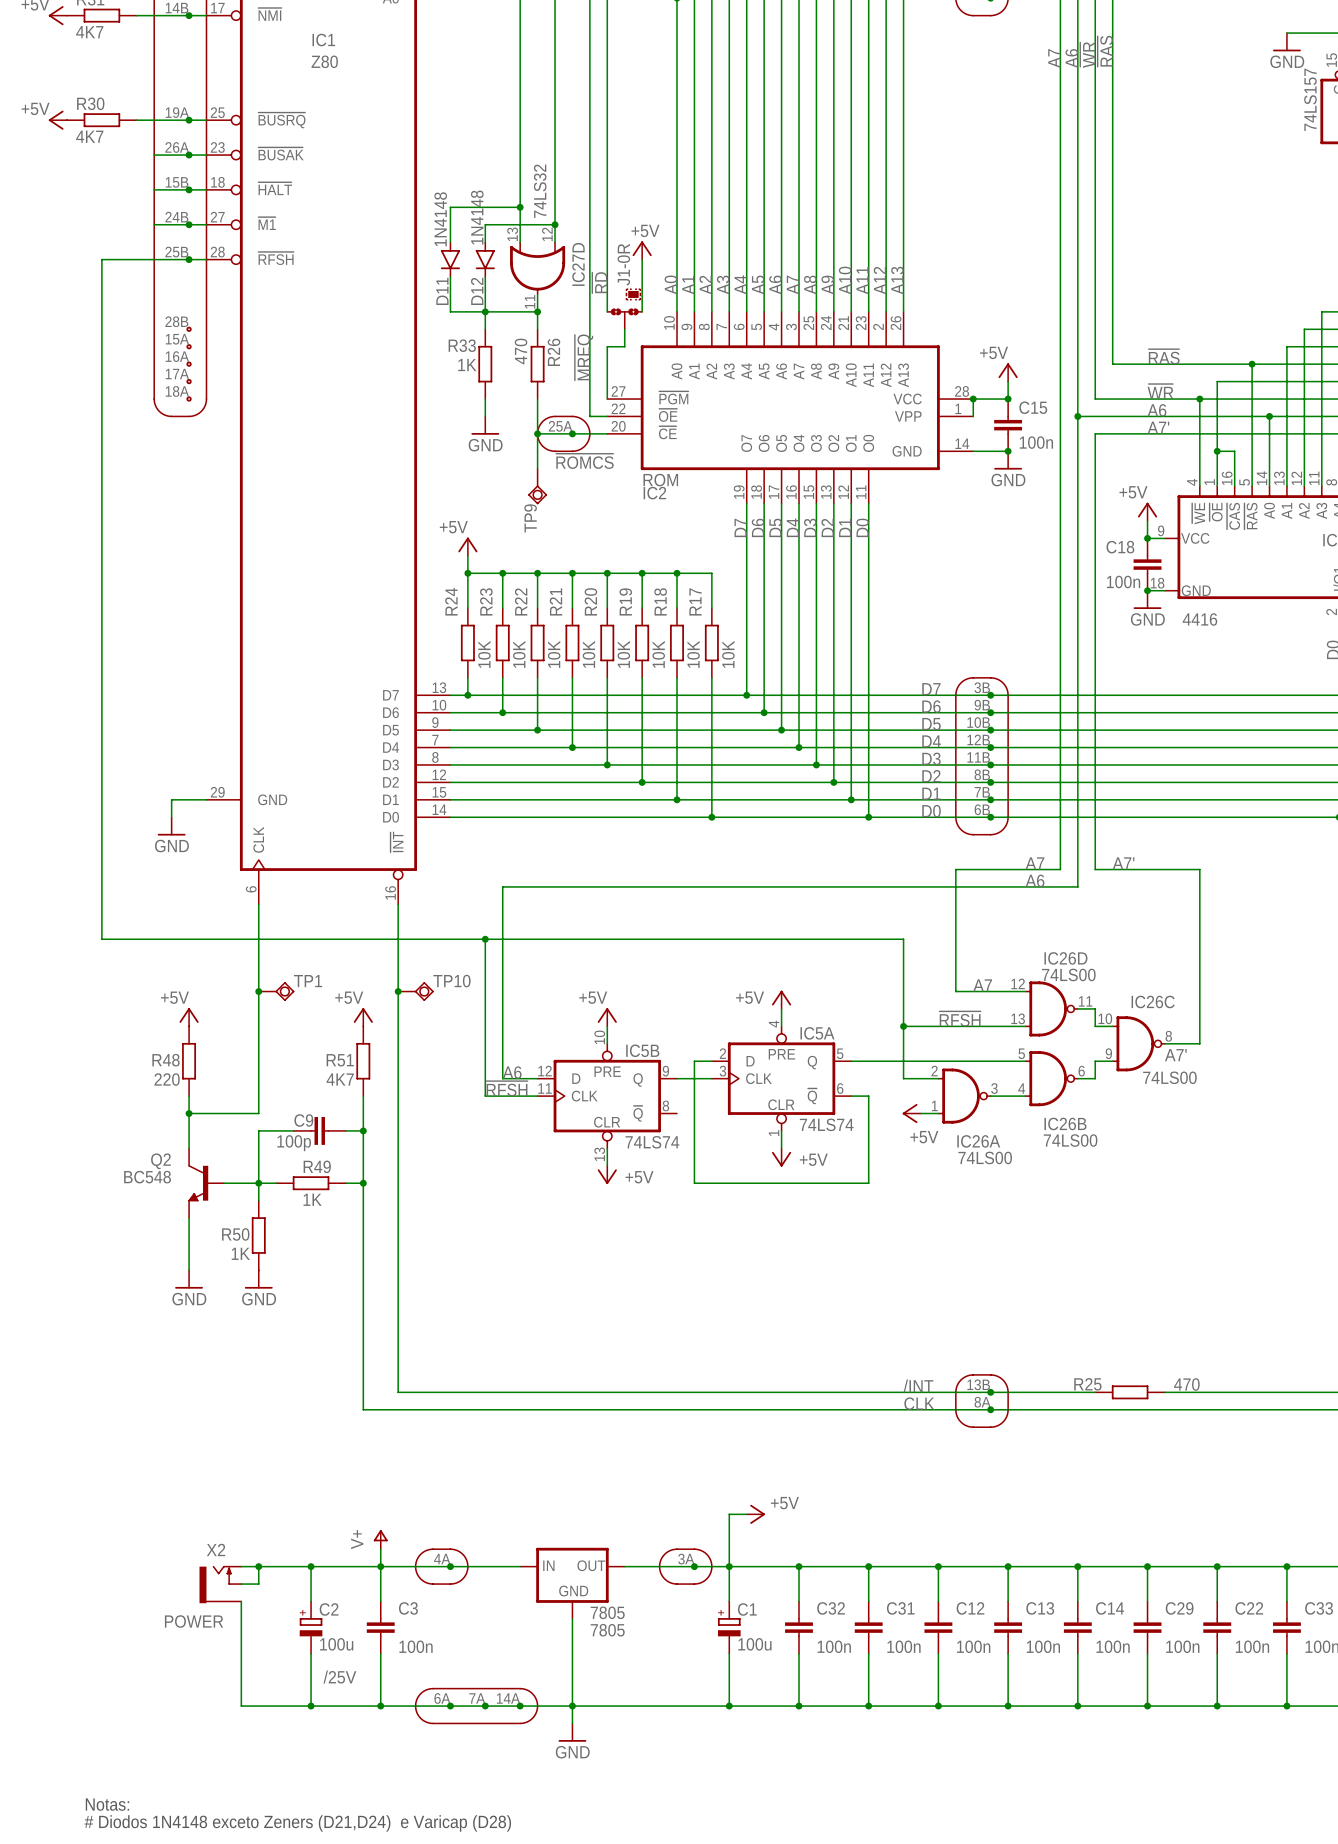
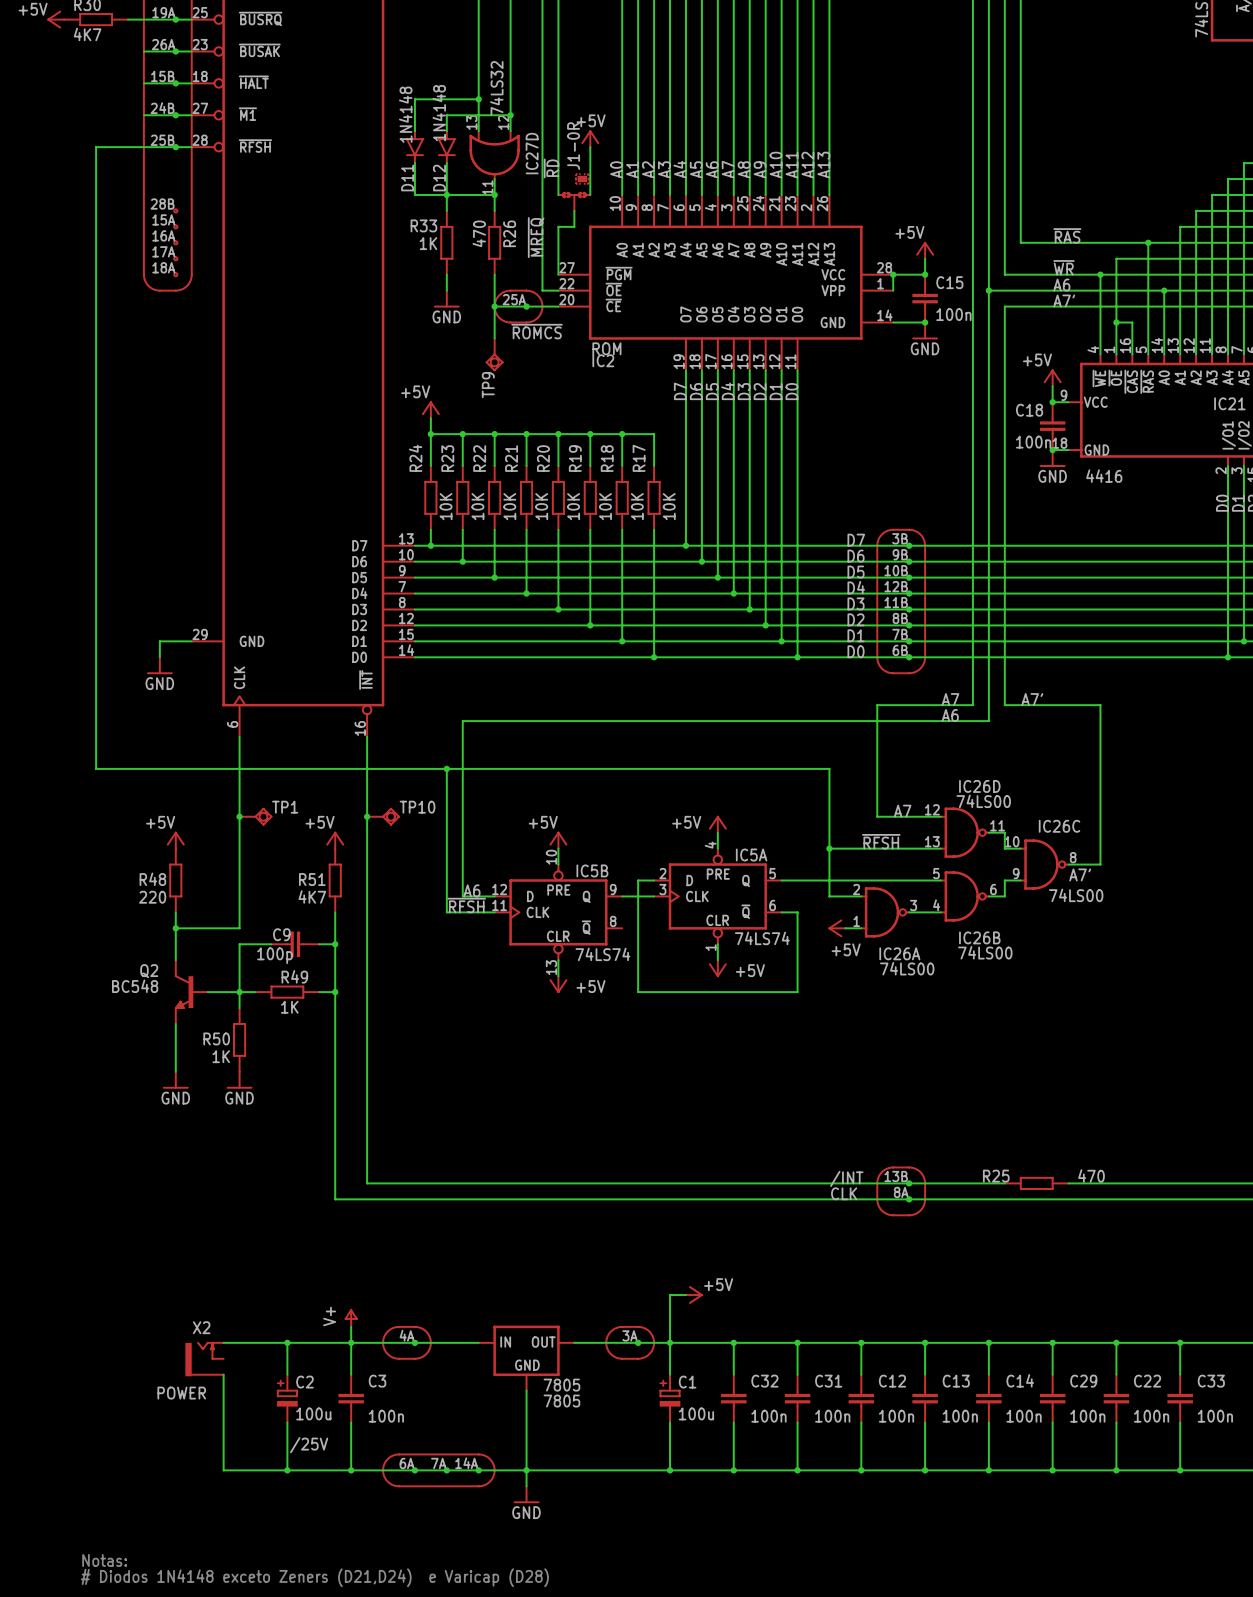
wire: (258, 1566) (258, 1584) (241, 1584) -> none
junction: (258, 1566) -> none

